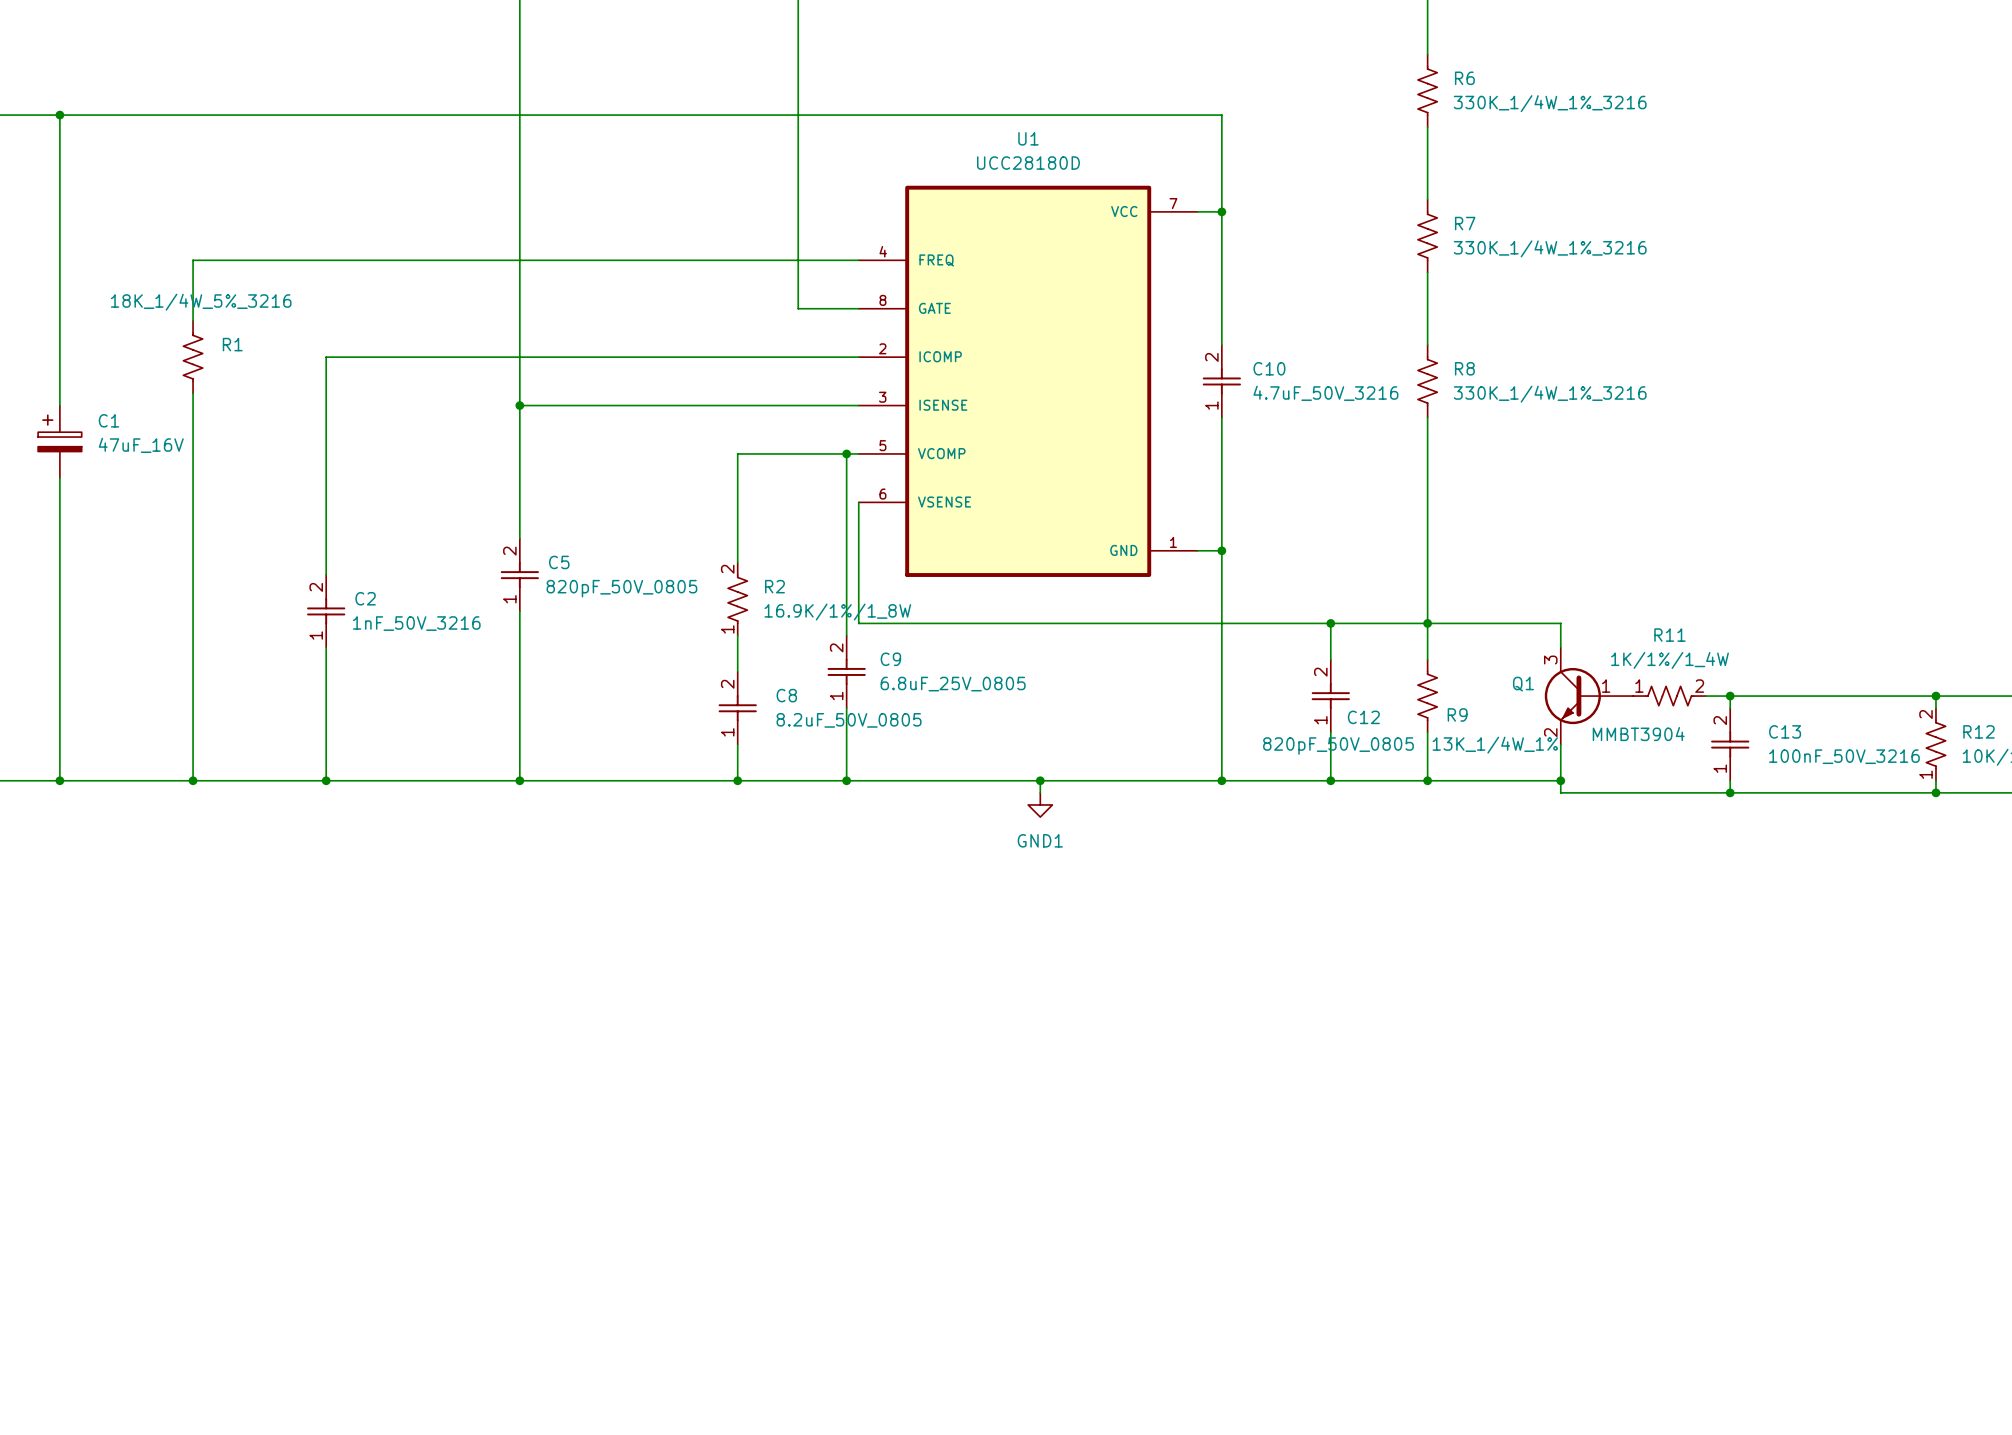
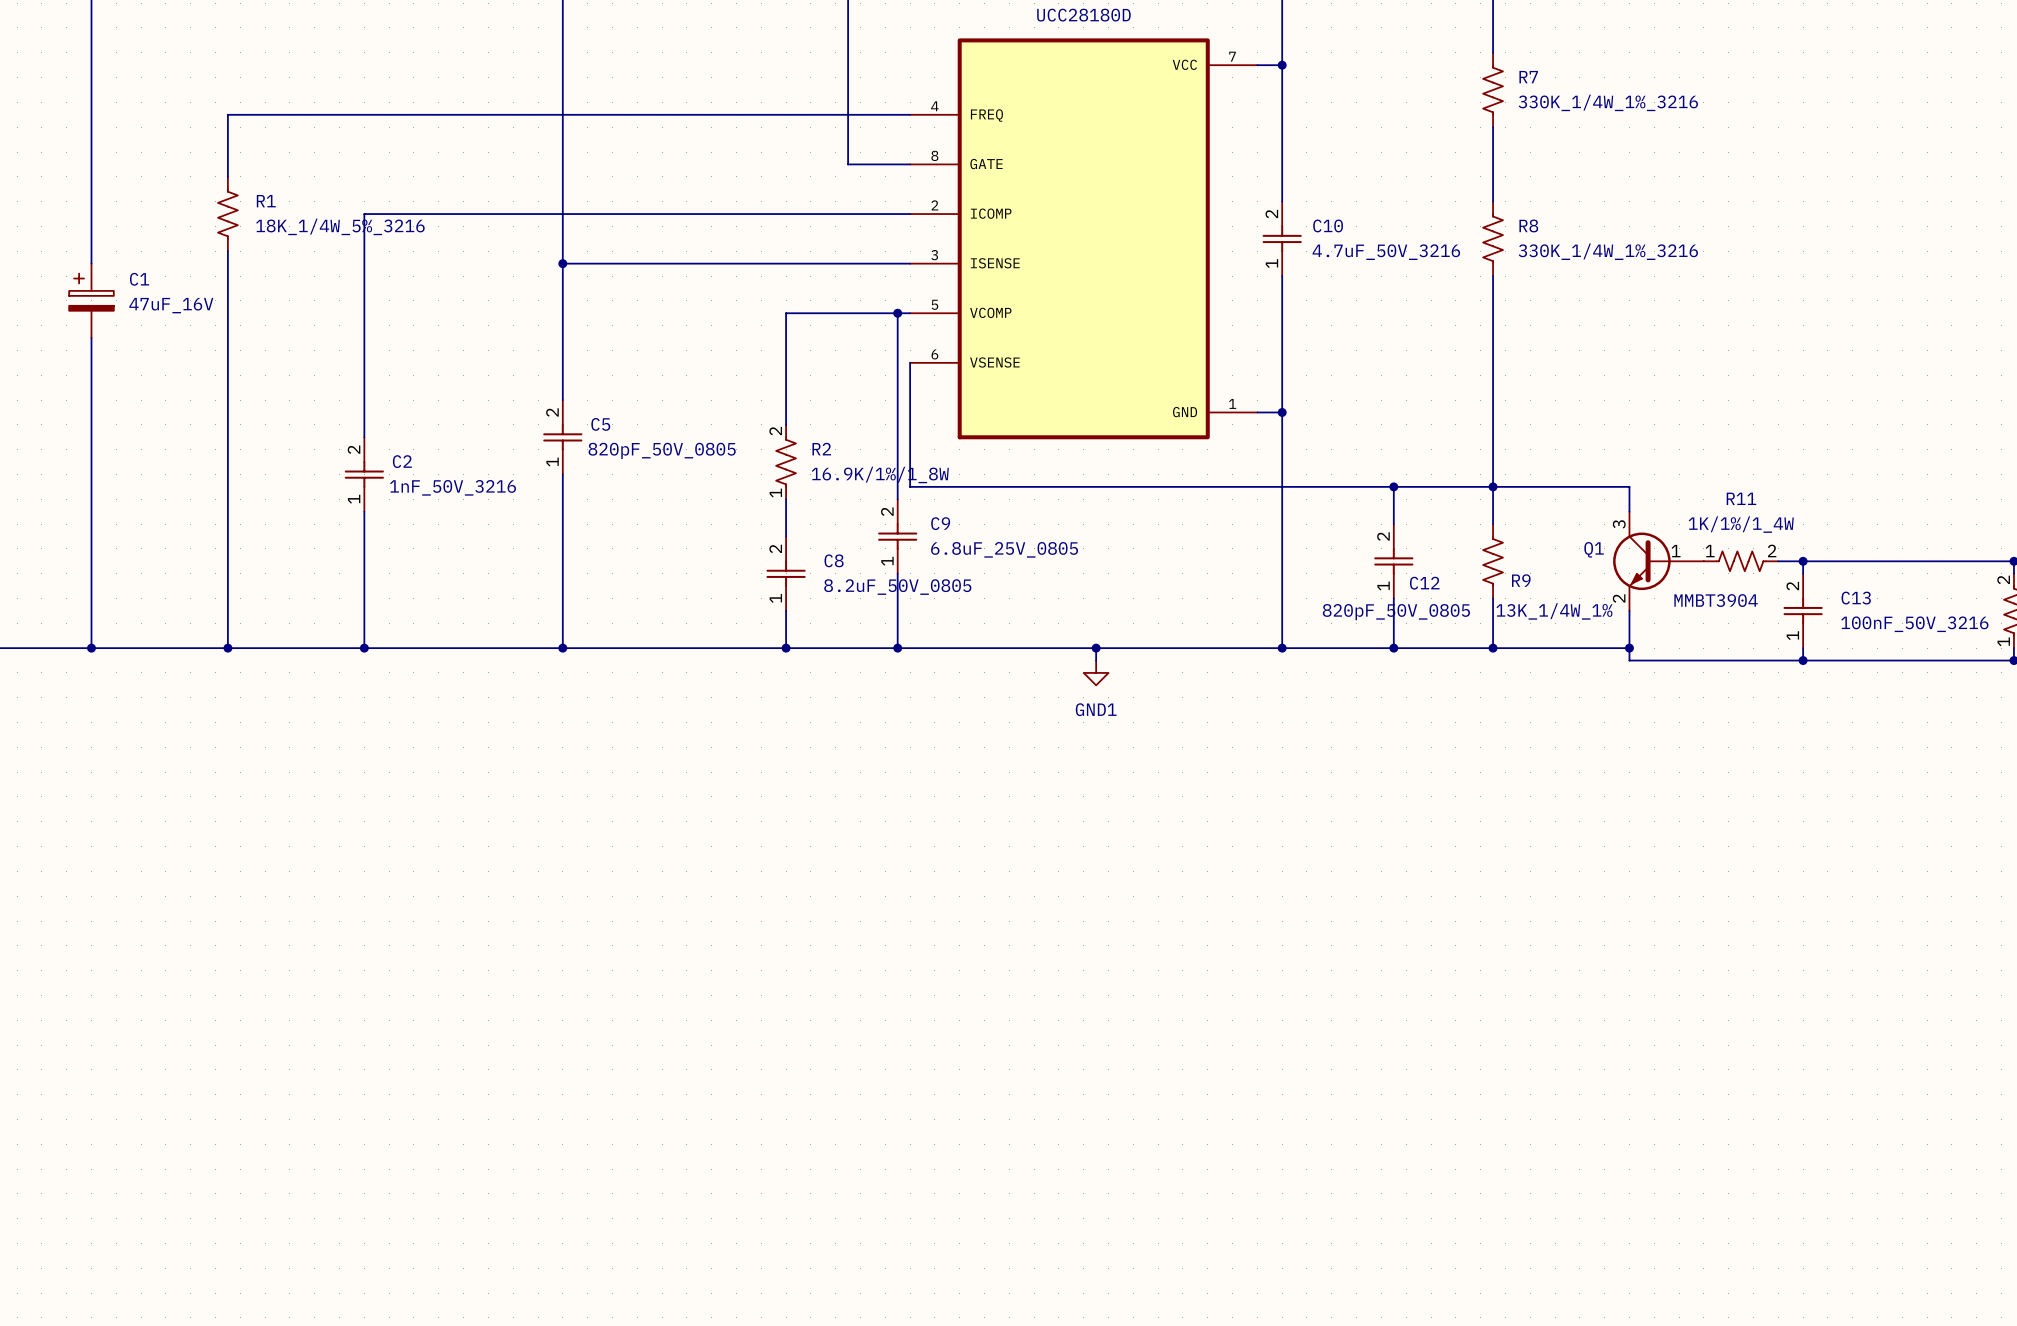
R1 value position: 18K_1/4W_5%_3216 (201, 302) -> 18K_1/4W_5%_3216 (340, 226)

